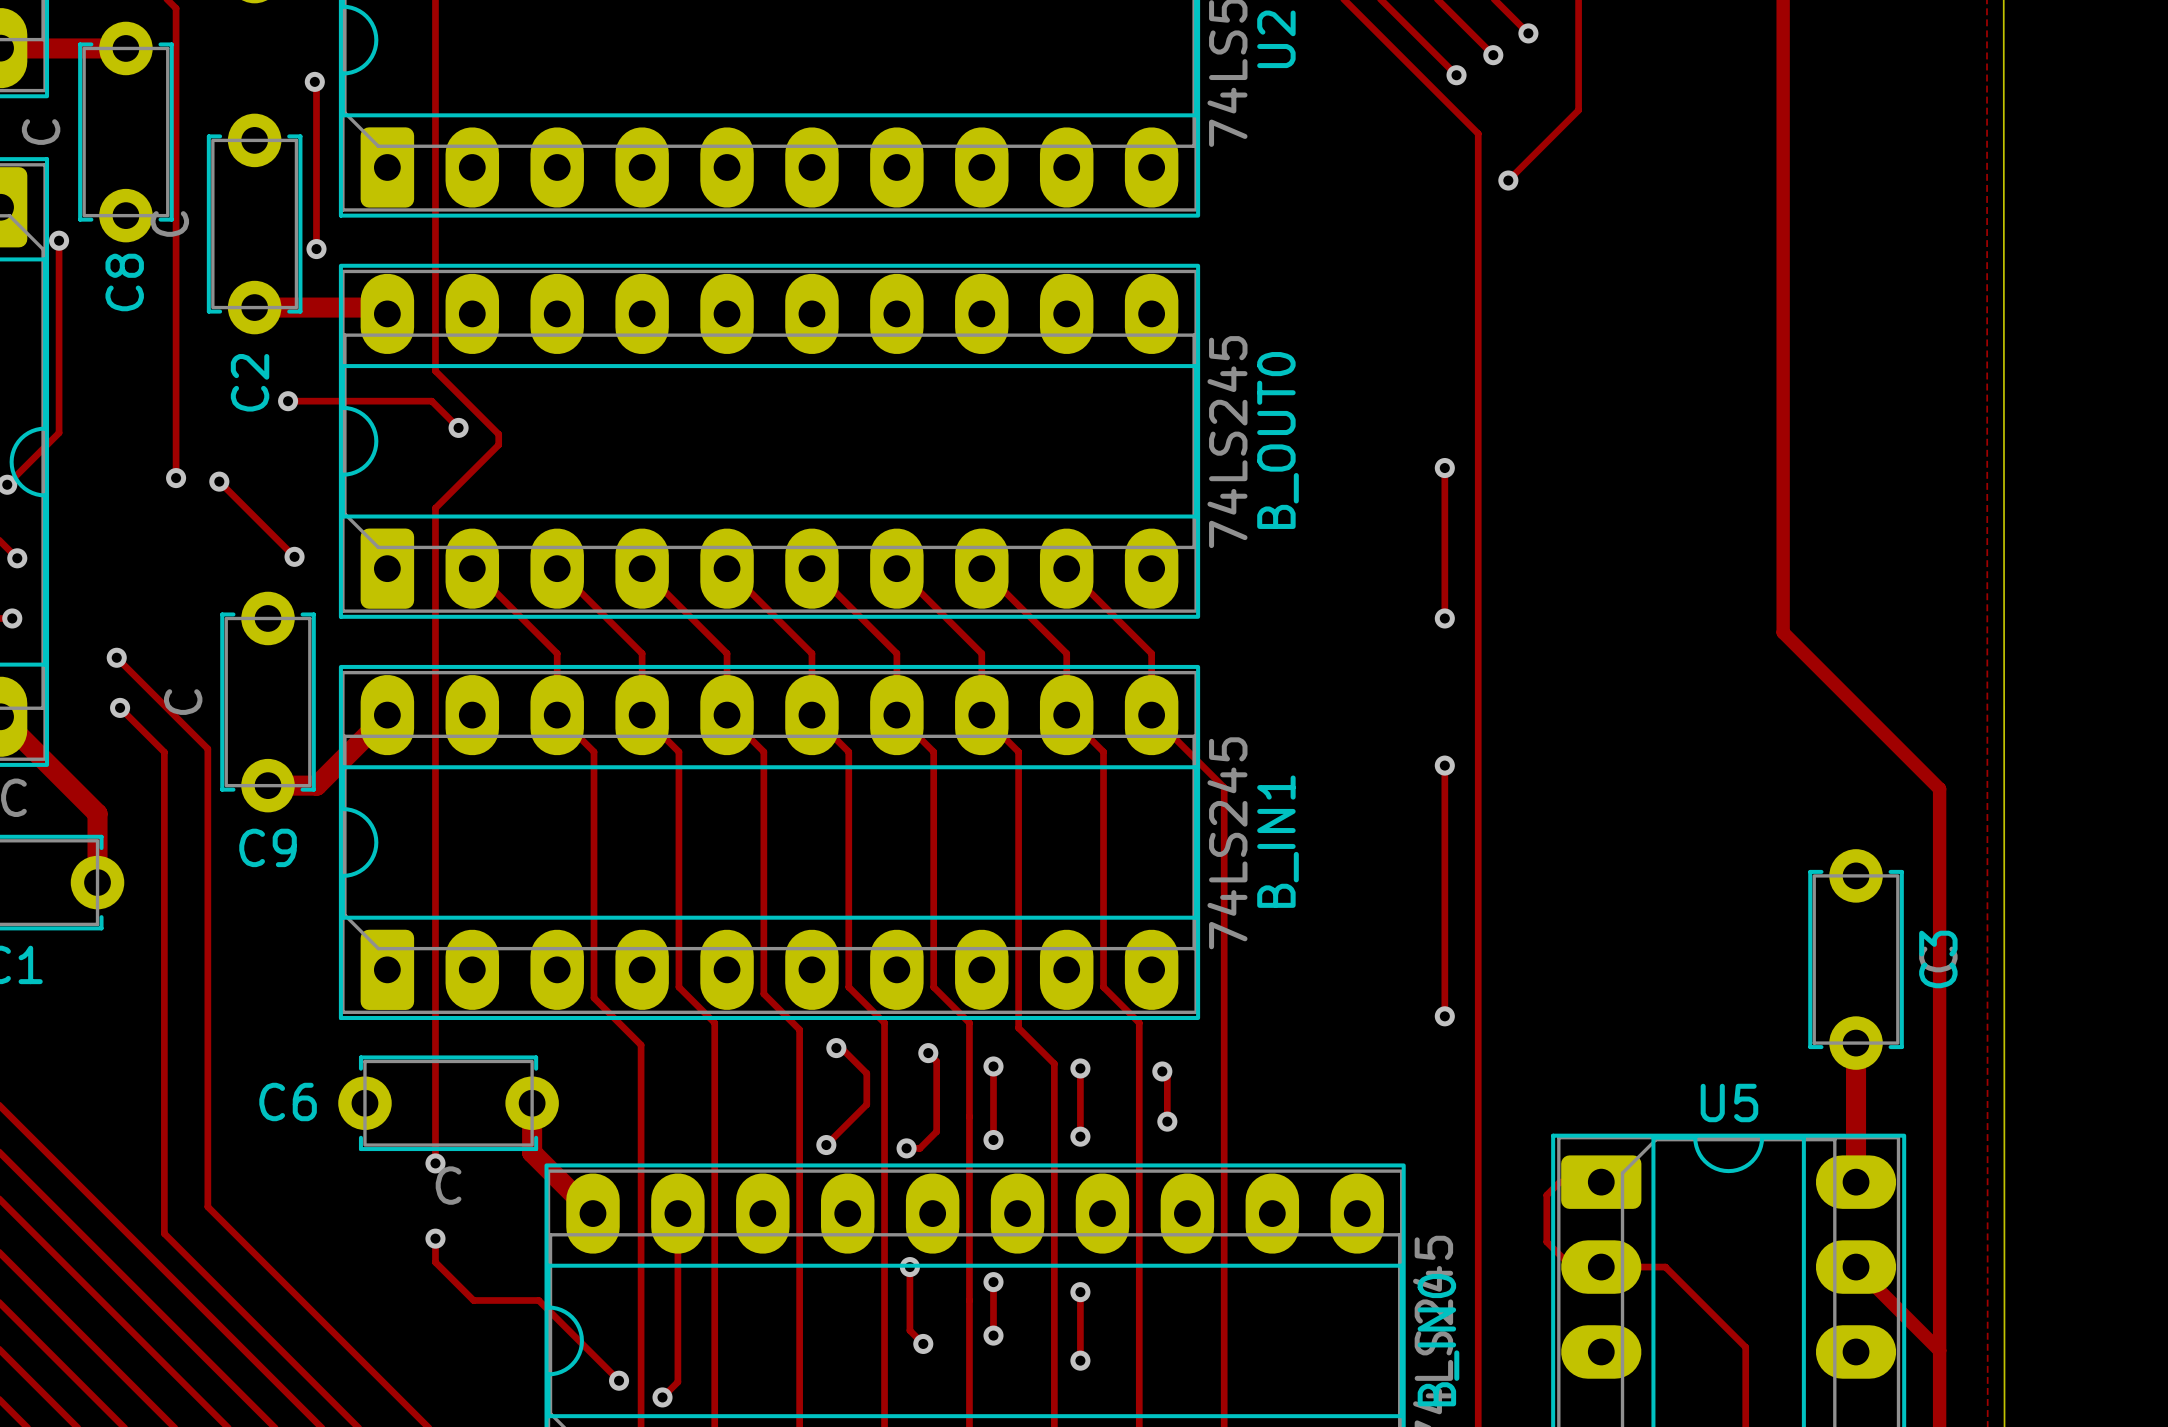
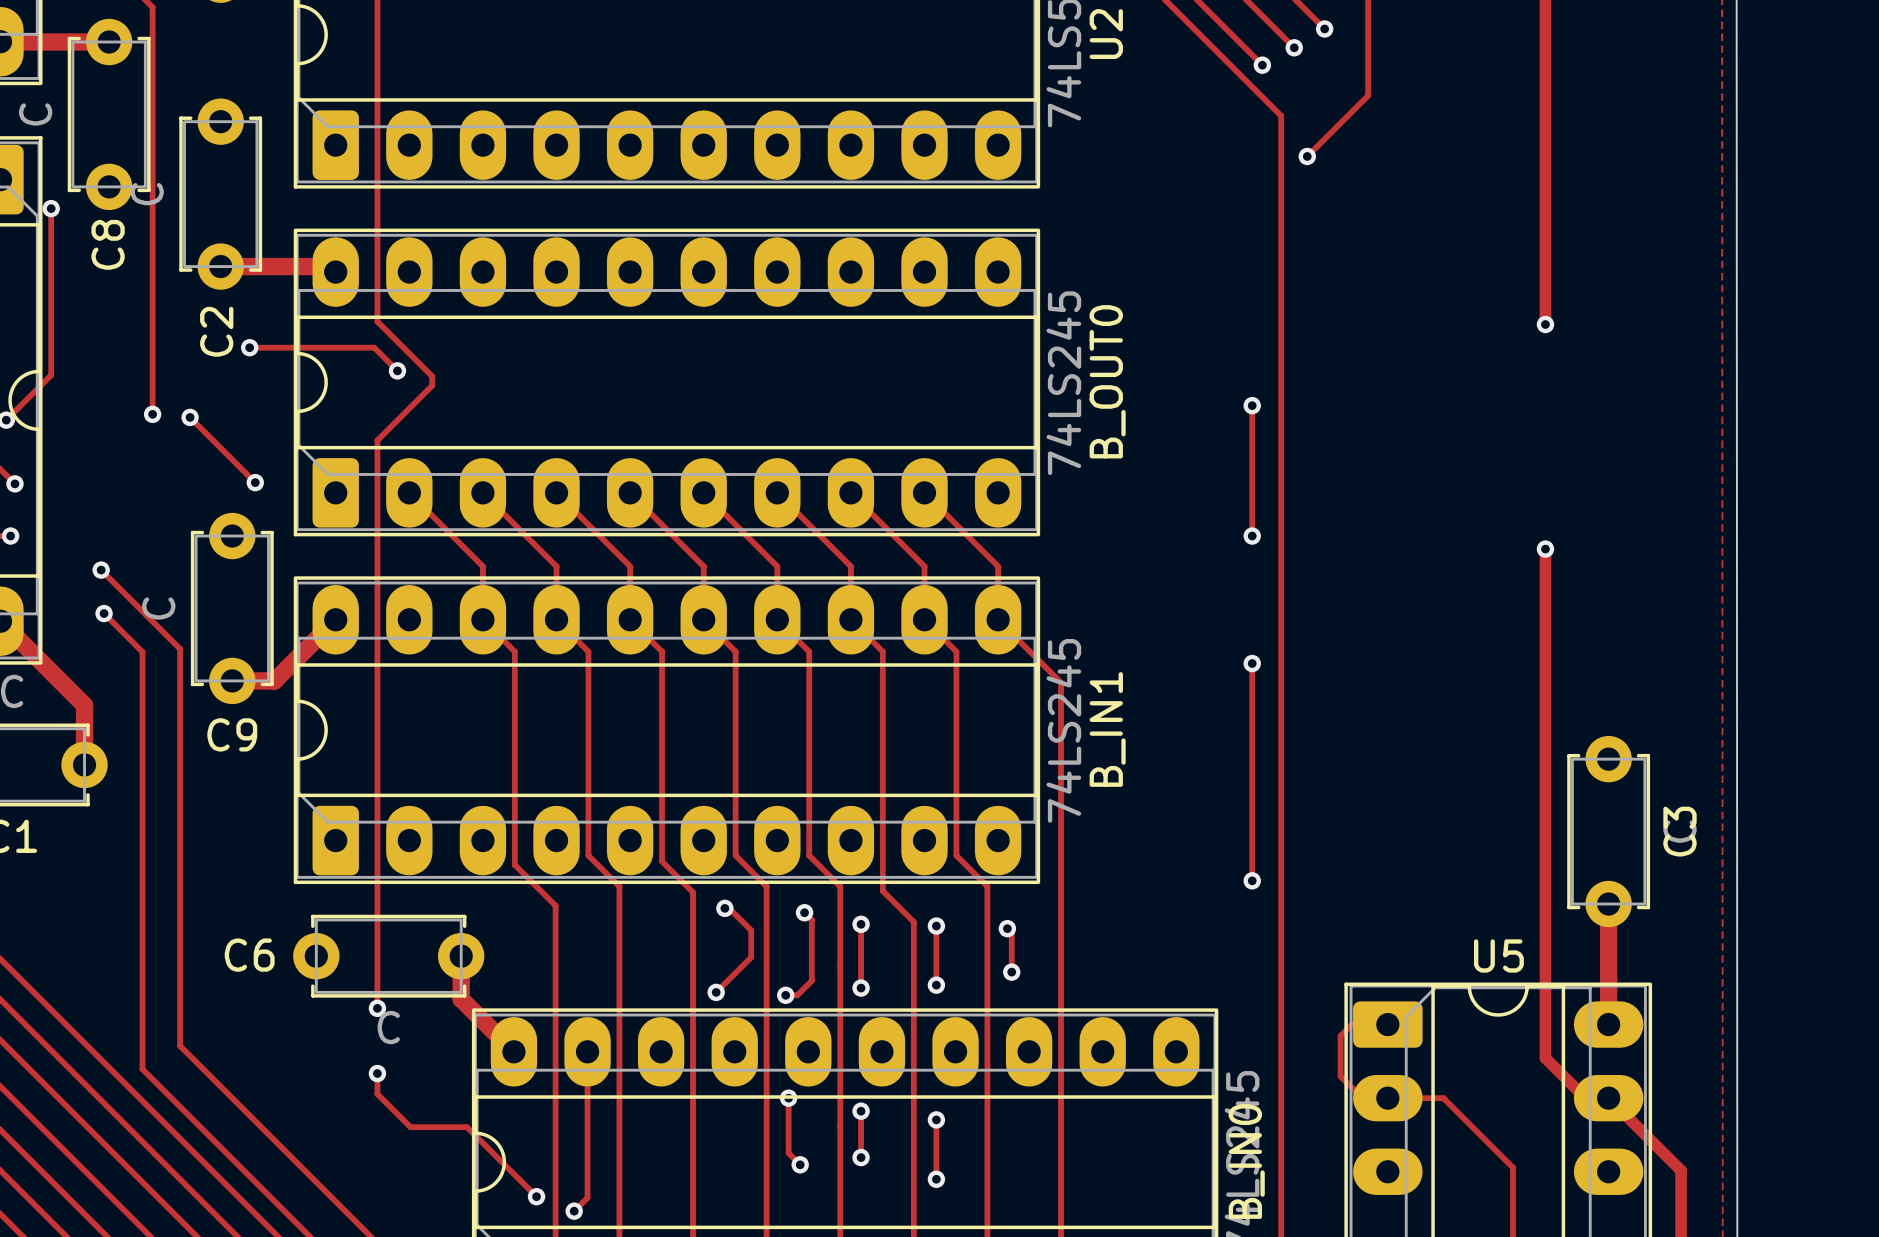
track: (314, 81) (316, 83) (316, 249) -> none
via: (314, 81) -> none
via: (316, 249) -> none
track: (1783, 374) (1783, 632) (1939, 788) (1939, 1350) -> none
via: none -> (1545, 324)
track: none -> (1545, 549) (1545, 1058) (1585, 1098)
via: none -> (1545, 549)

